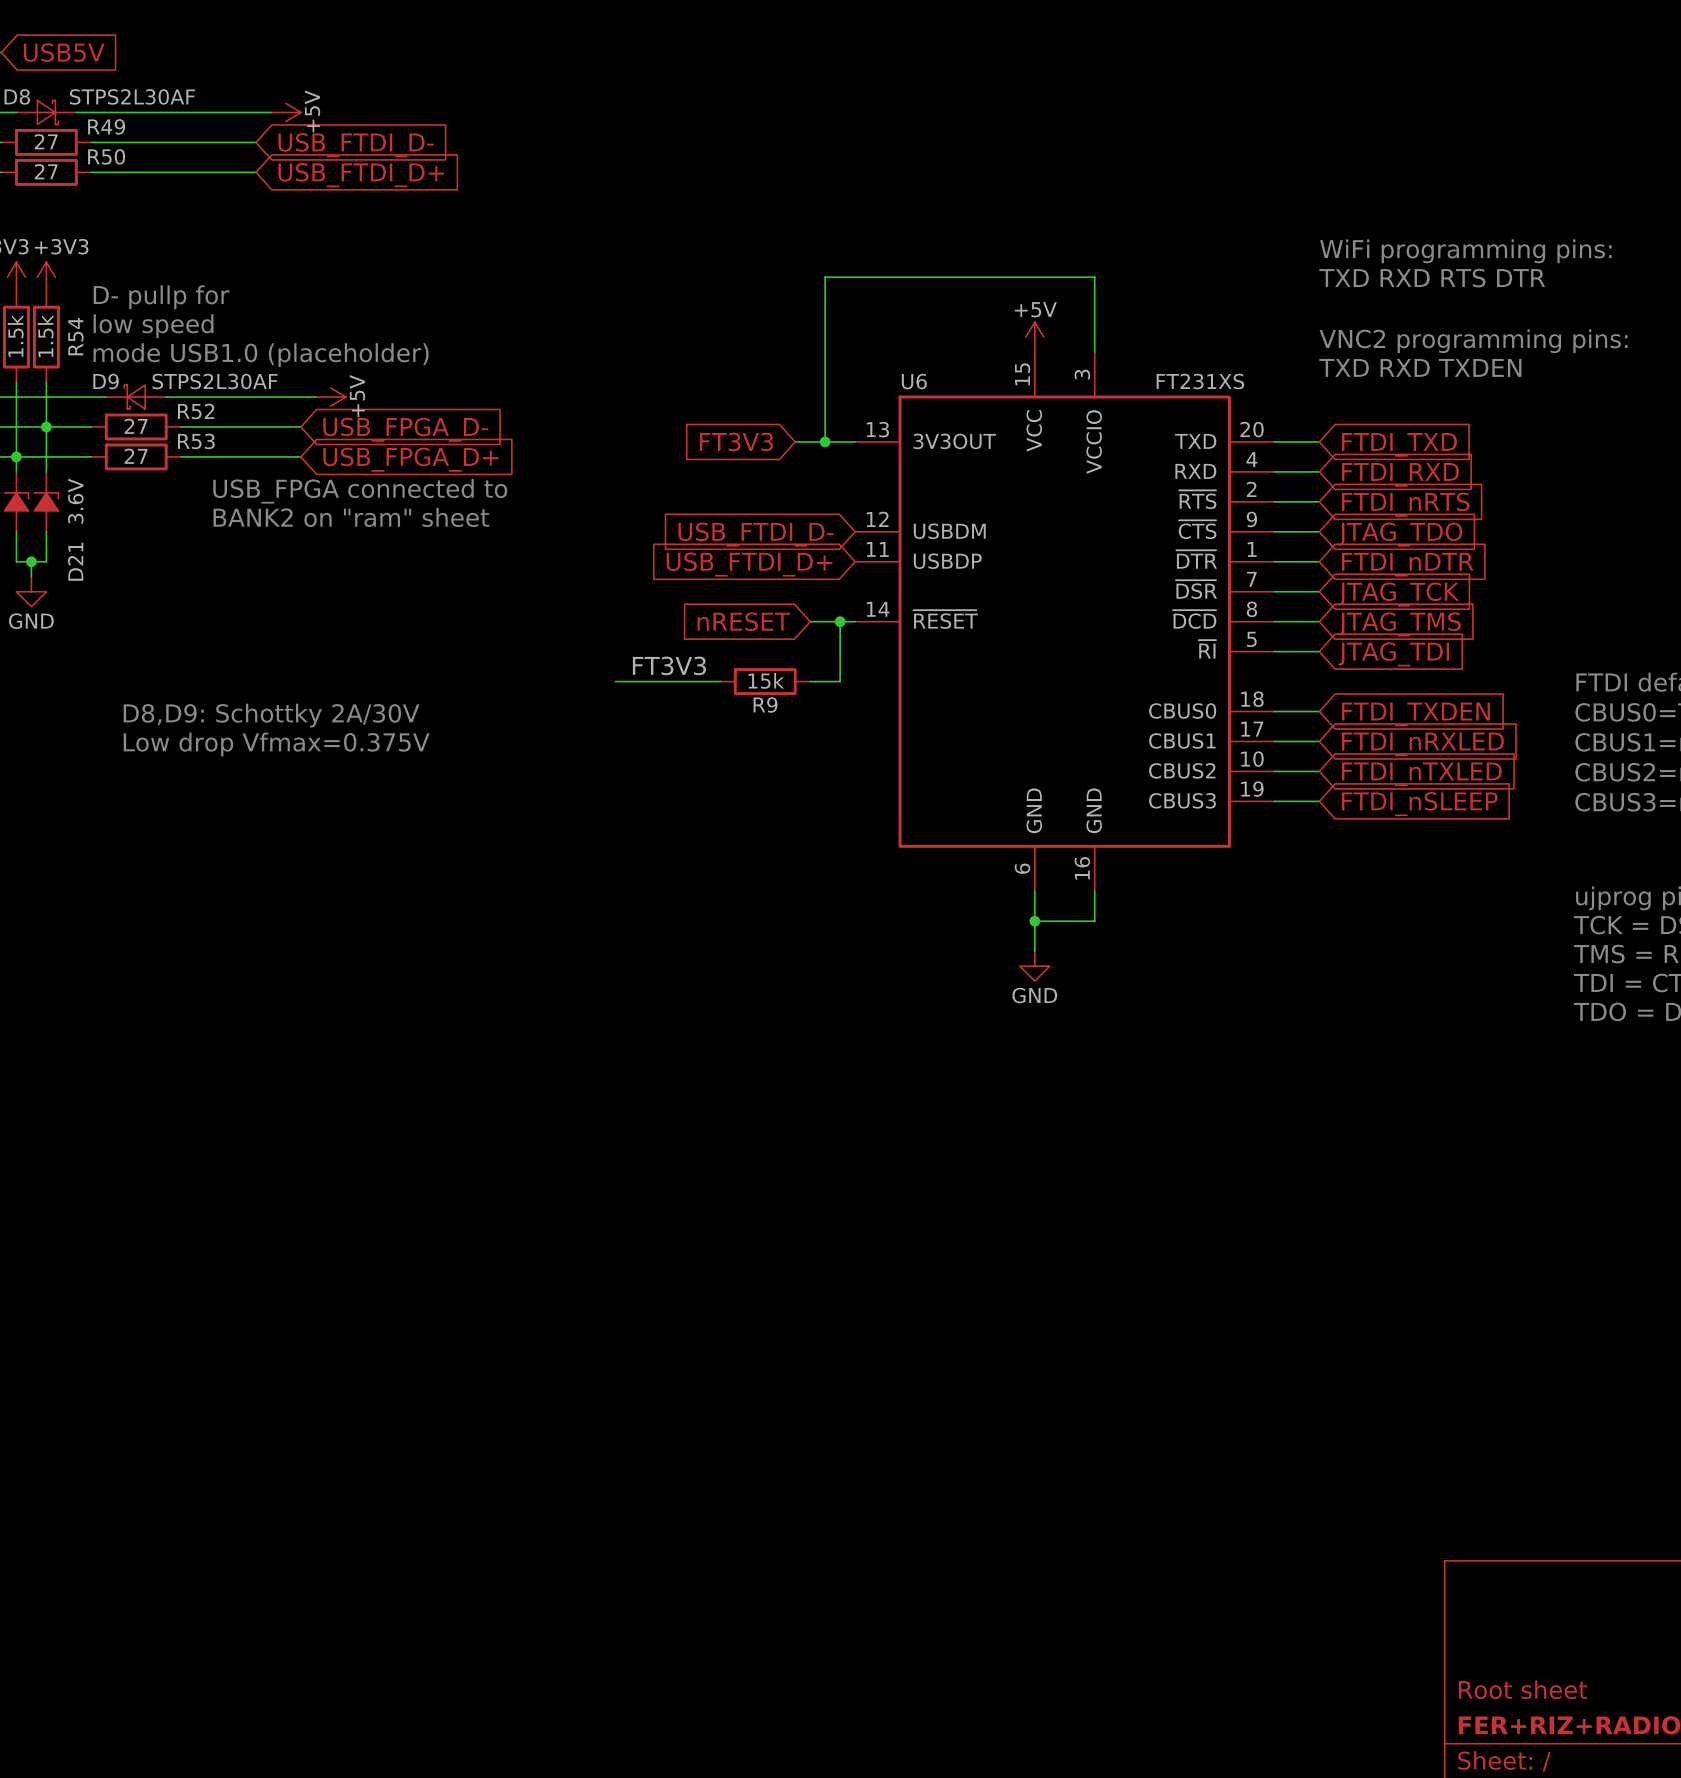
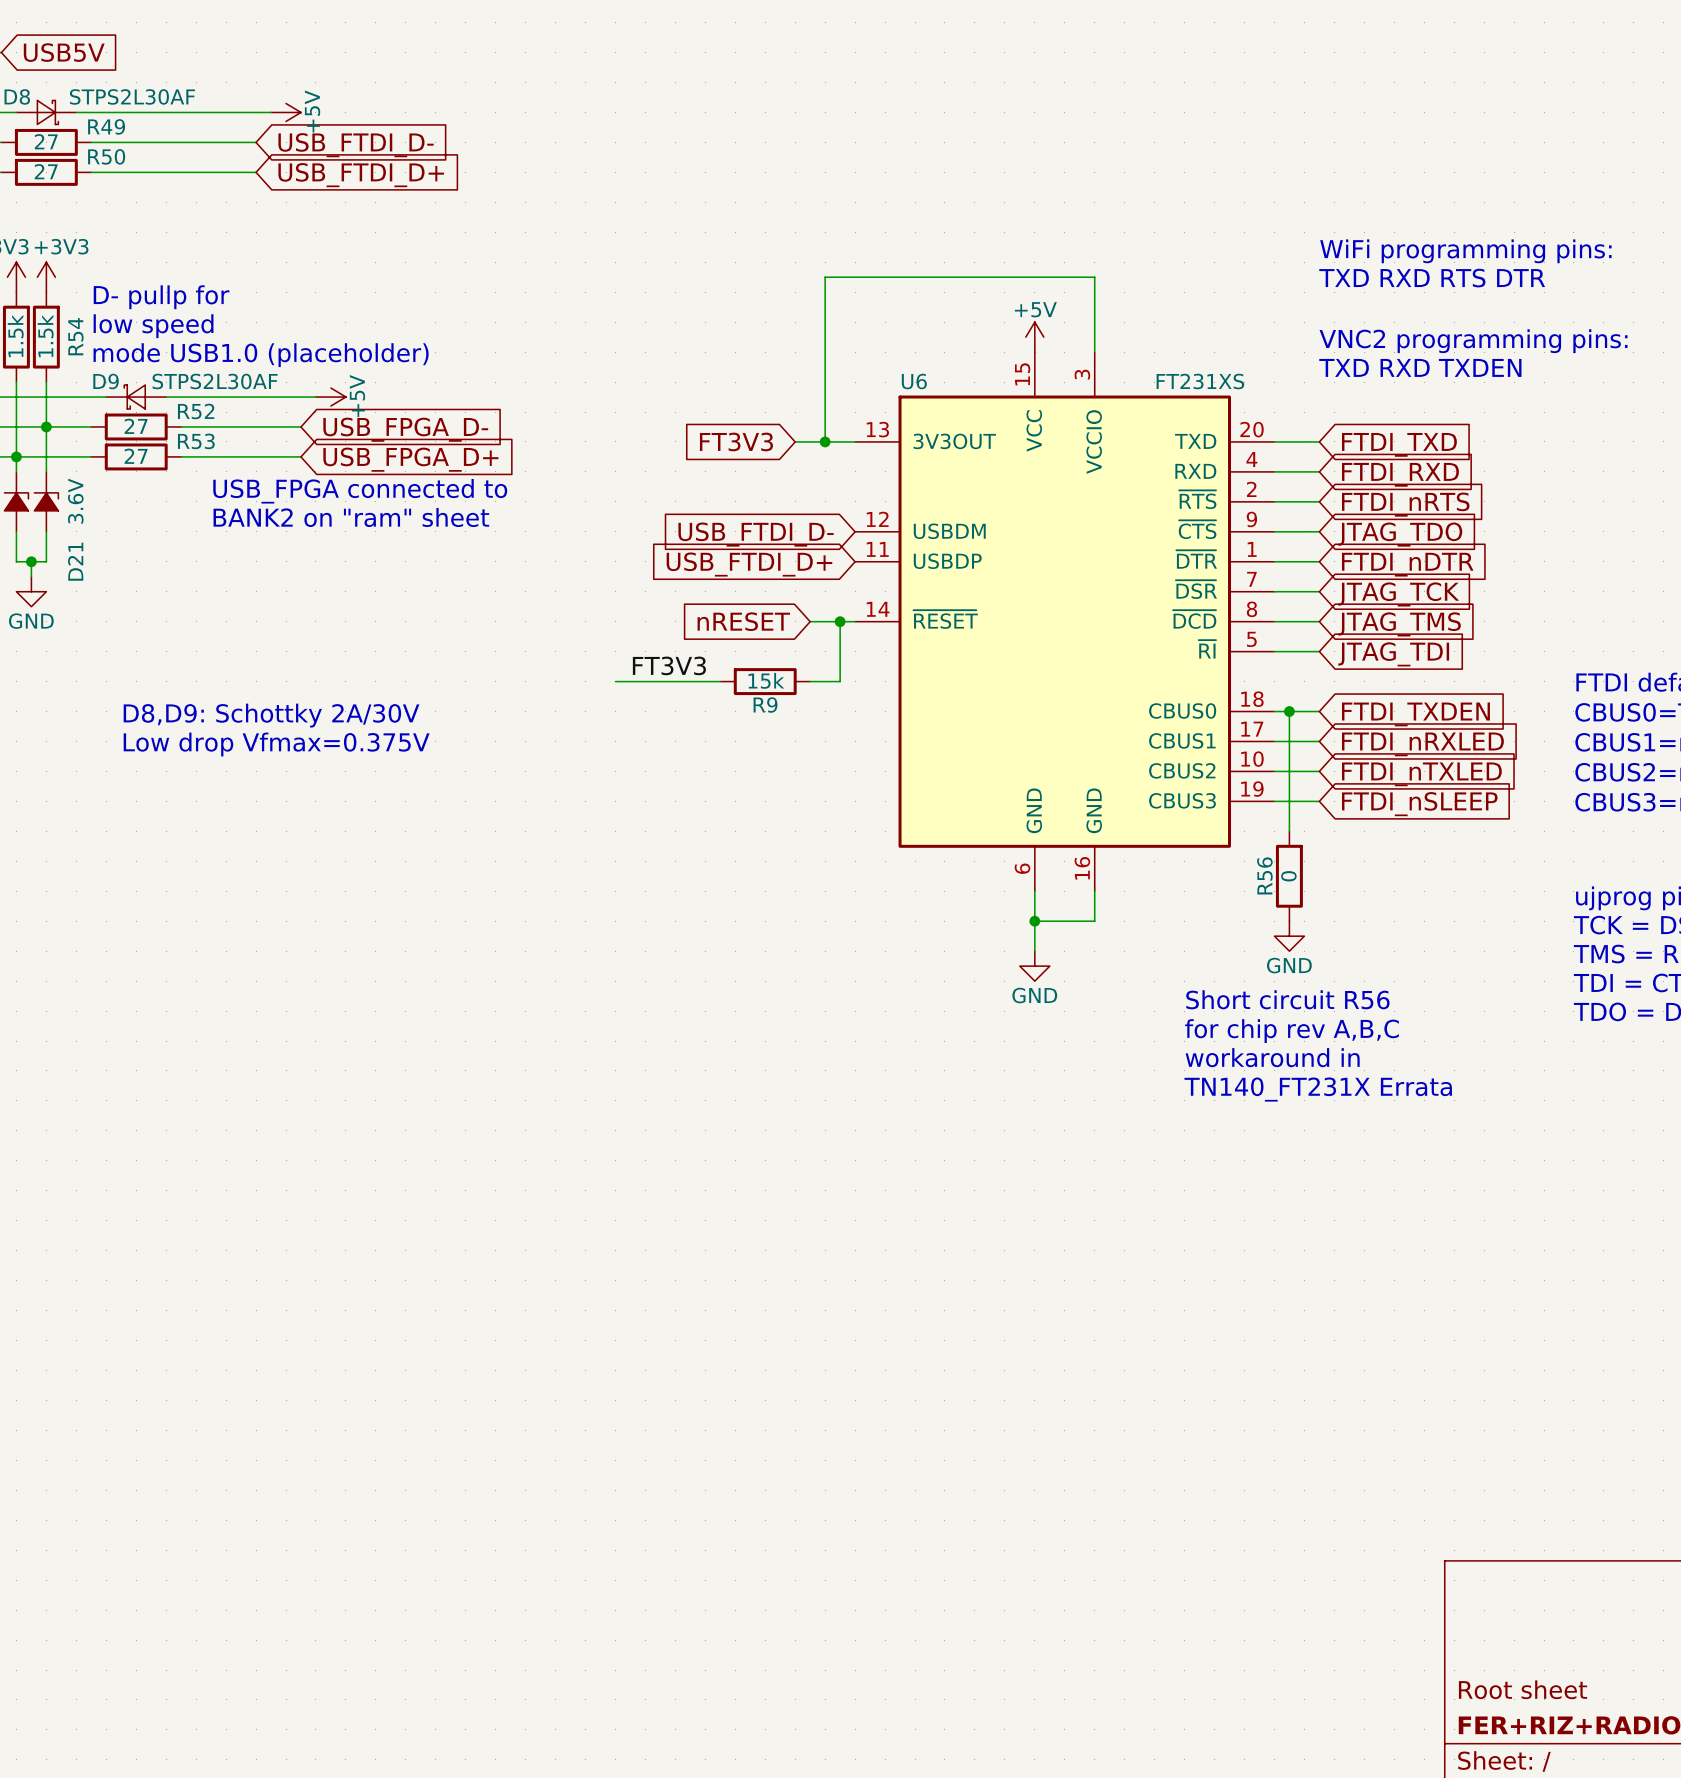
wire: none -> (1289, 711) (1289, 831)
junction: none -> (1289, 711)
R56: none -> 0 (1289, 876)
power symbol: none -> GND (1289, 936)
text: none -> Short circuit R56 (1287, 999)
text: none -> for chip rev A,B,C (1292, 1031)
text: none -> workaround in (1272, 1057)
text: none -> TN140_FT231X Errata (1318, 1089)

